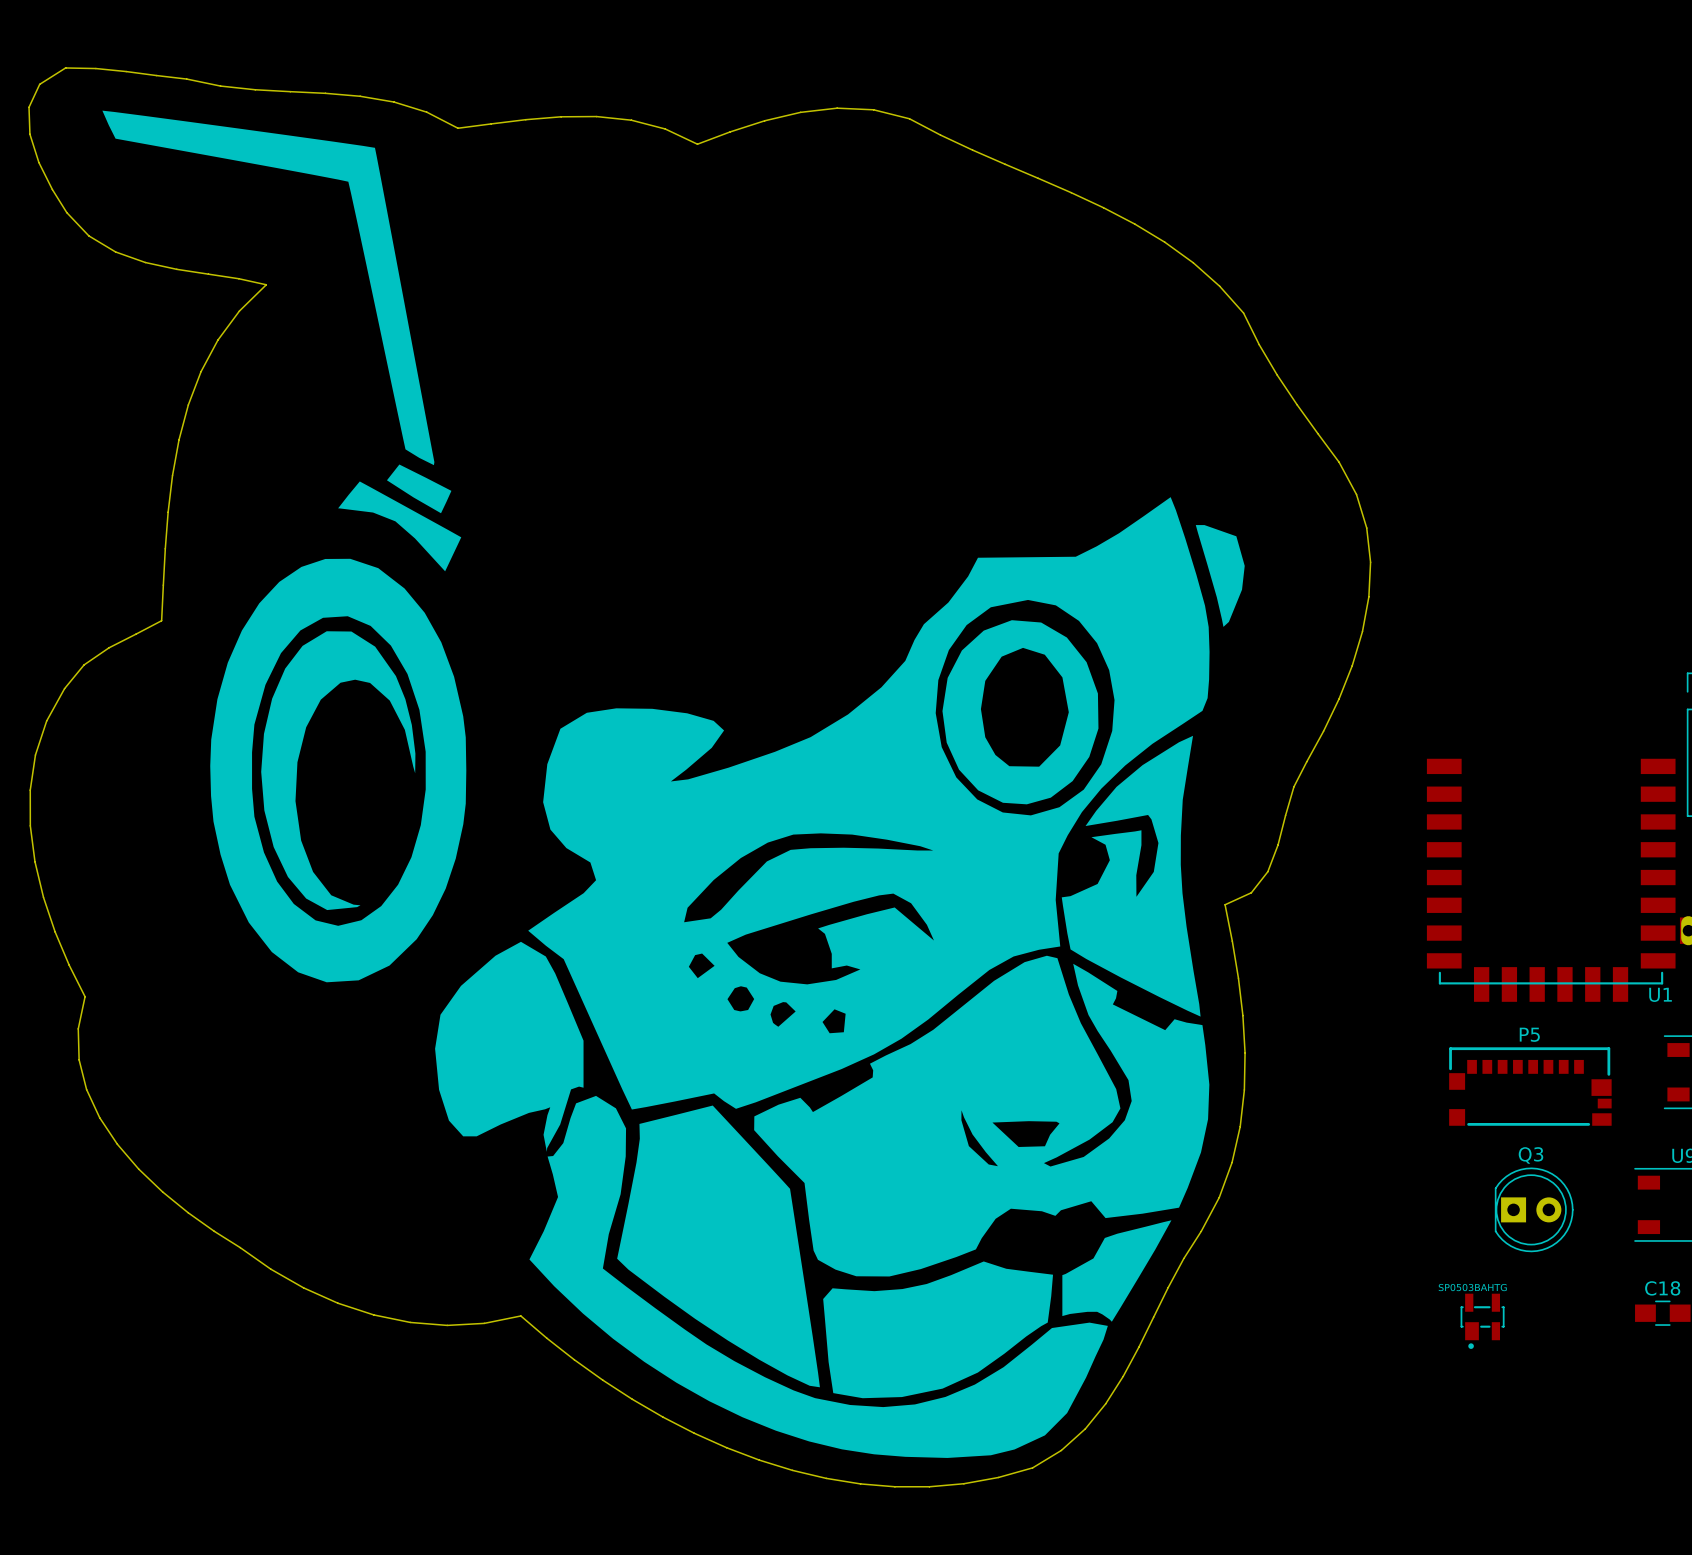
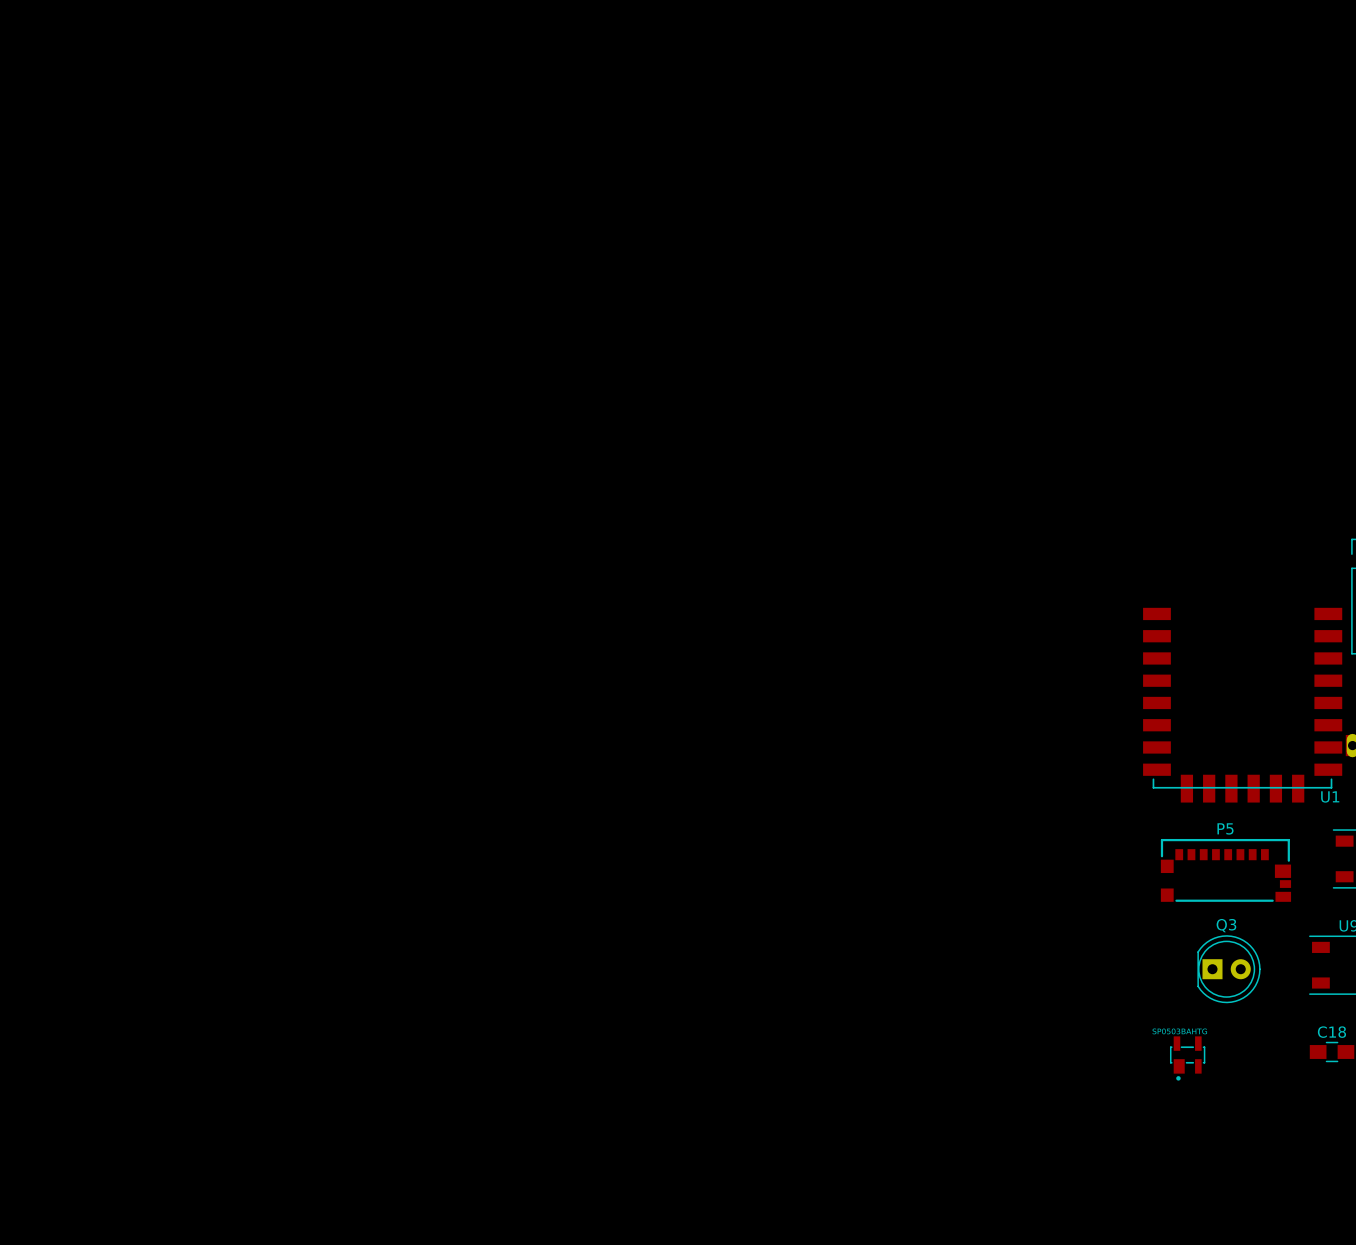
drawing: [28, 67, 1372, 1488] -> none

